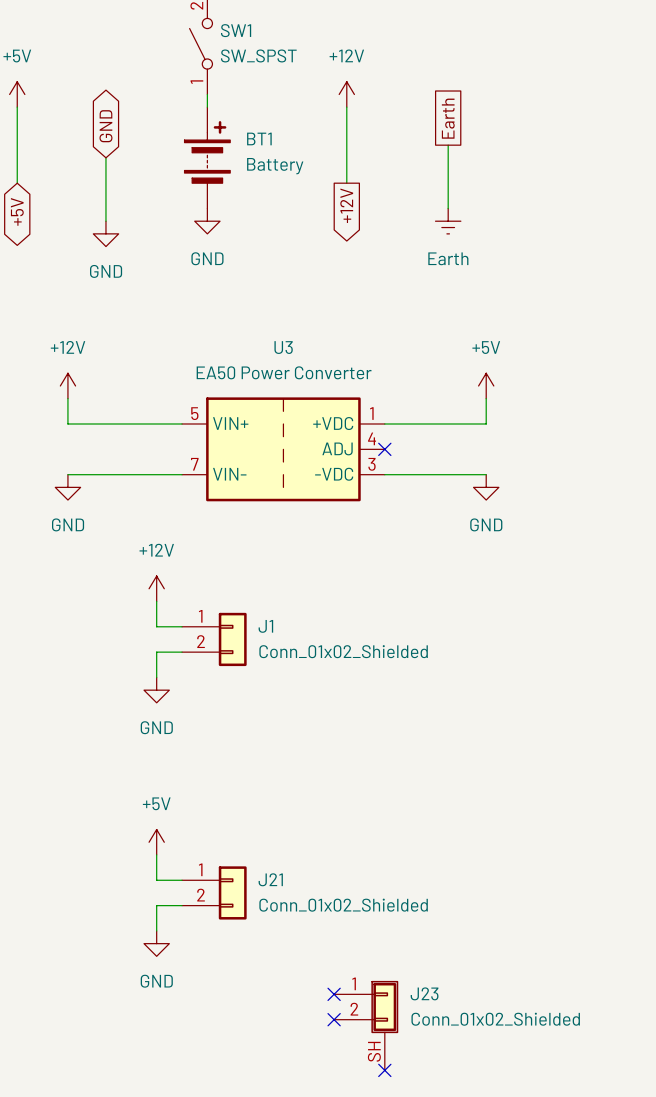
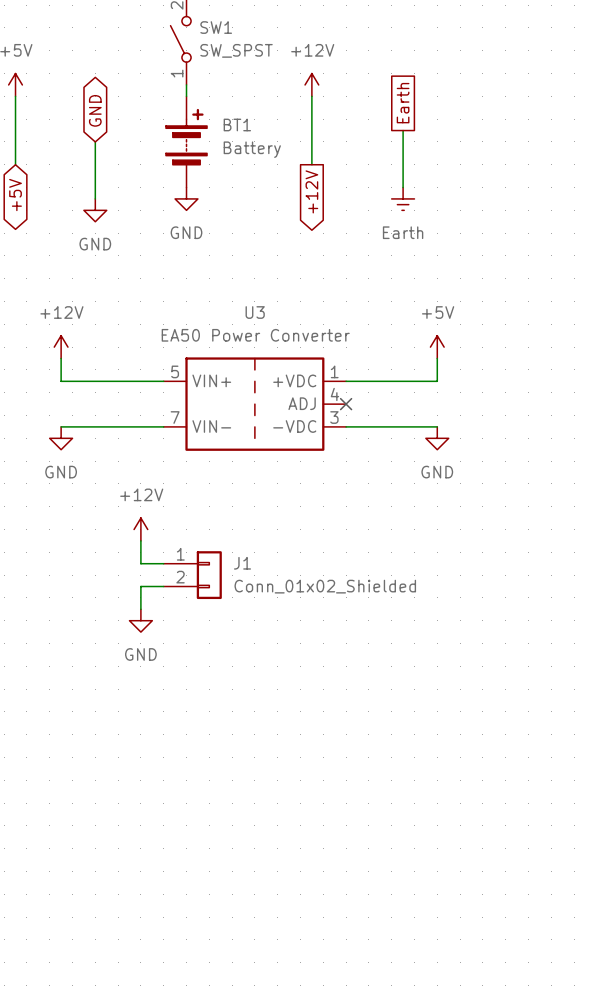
power symbol: +5V (156, 842) -> none
wire: (156, 854) (156, 880) (182, 880) -> none
J21: Conn_01x02_Shielded (214, 892) -> none
wire: (182, 905) (156, 905) (156, 930) -> none
power symbol: GND (156, 943) -> none
no-connect mark: (334, 994) -> none
no-connect mark: (334, 1019) -> none
J23: Conn_01x02_Shielded (366, 1025) -> none
no-connect mark: (384, 1070) -> none

